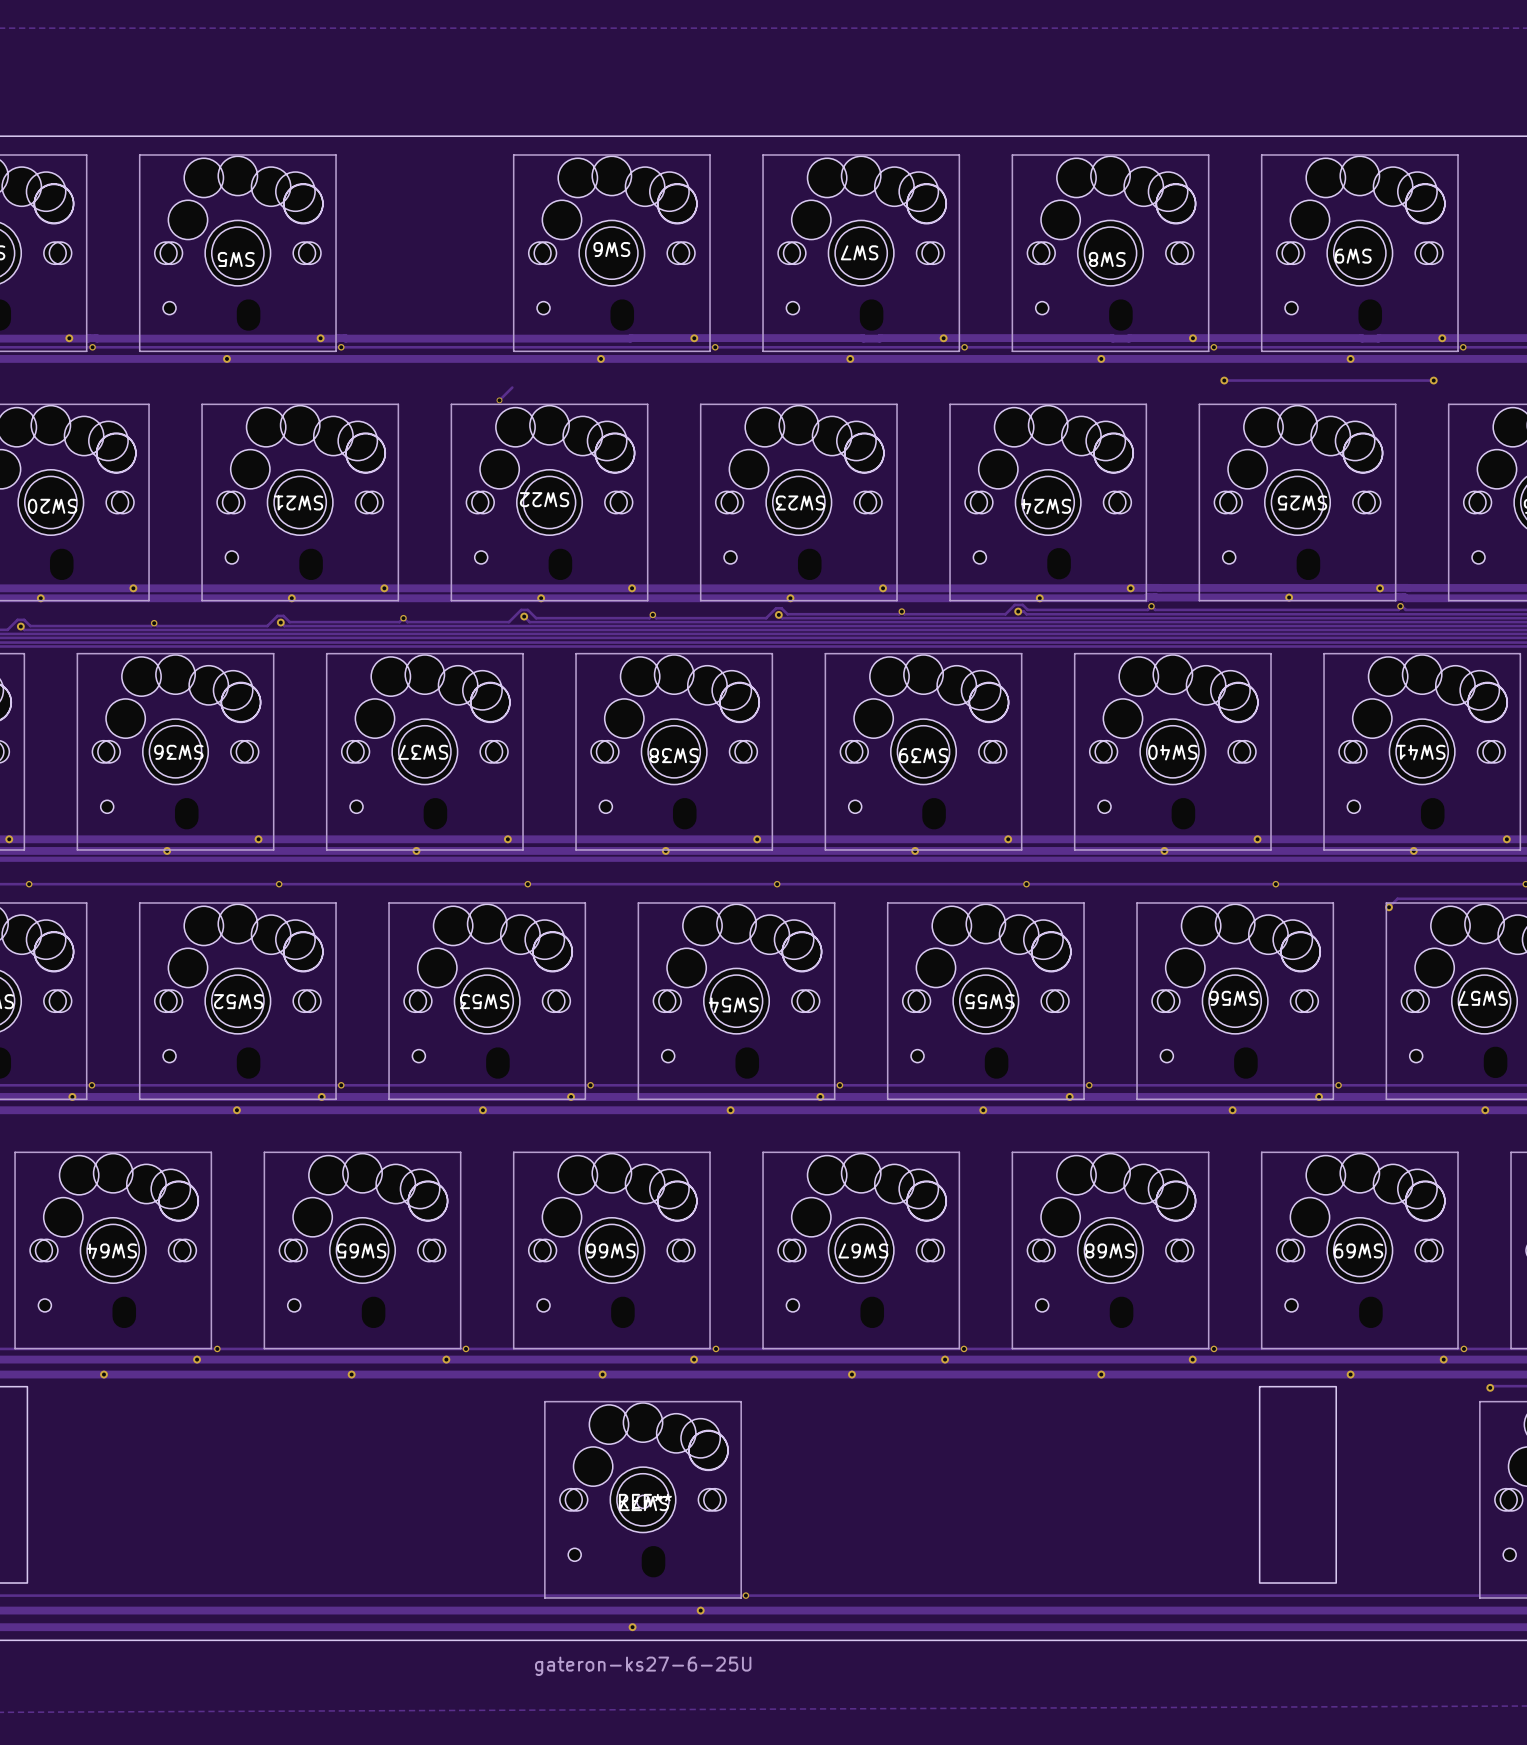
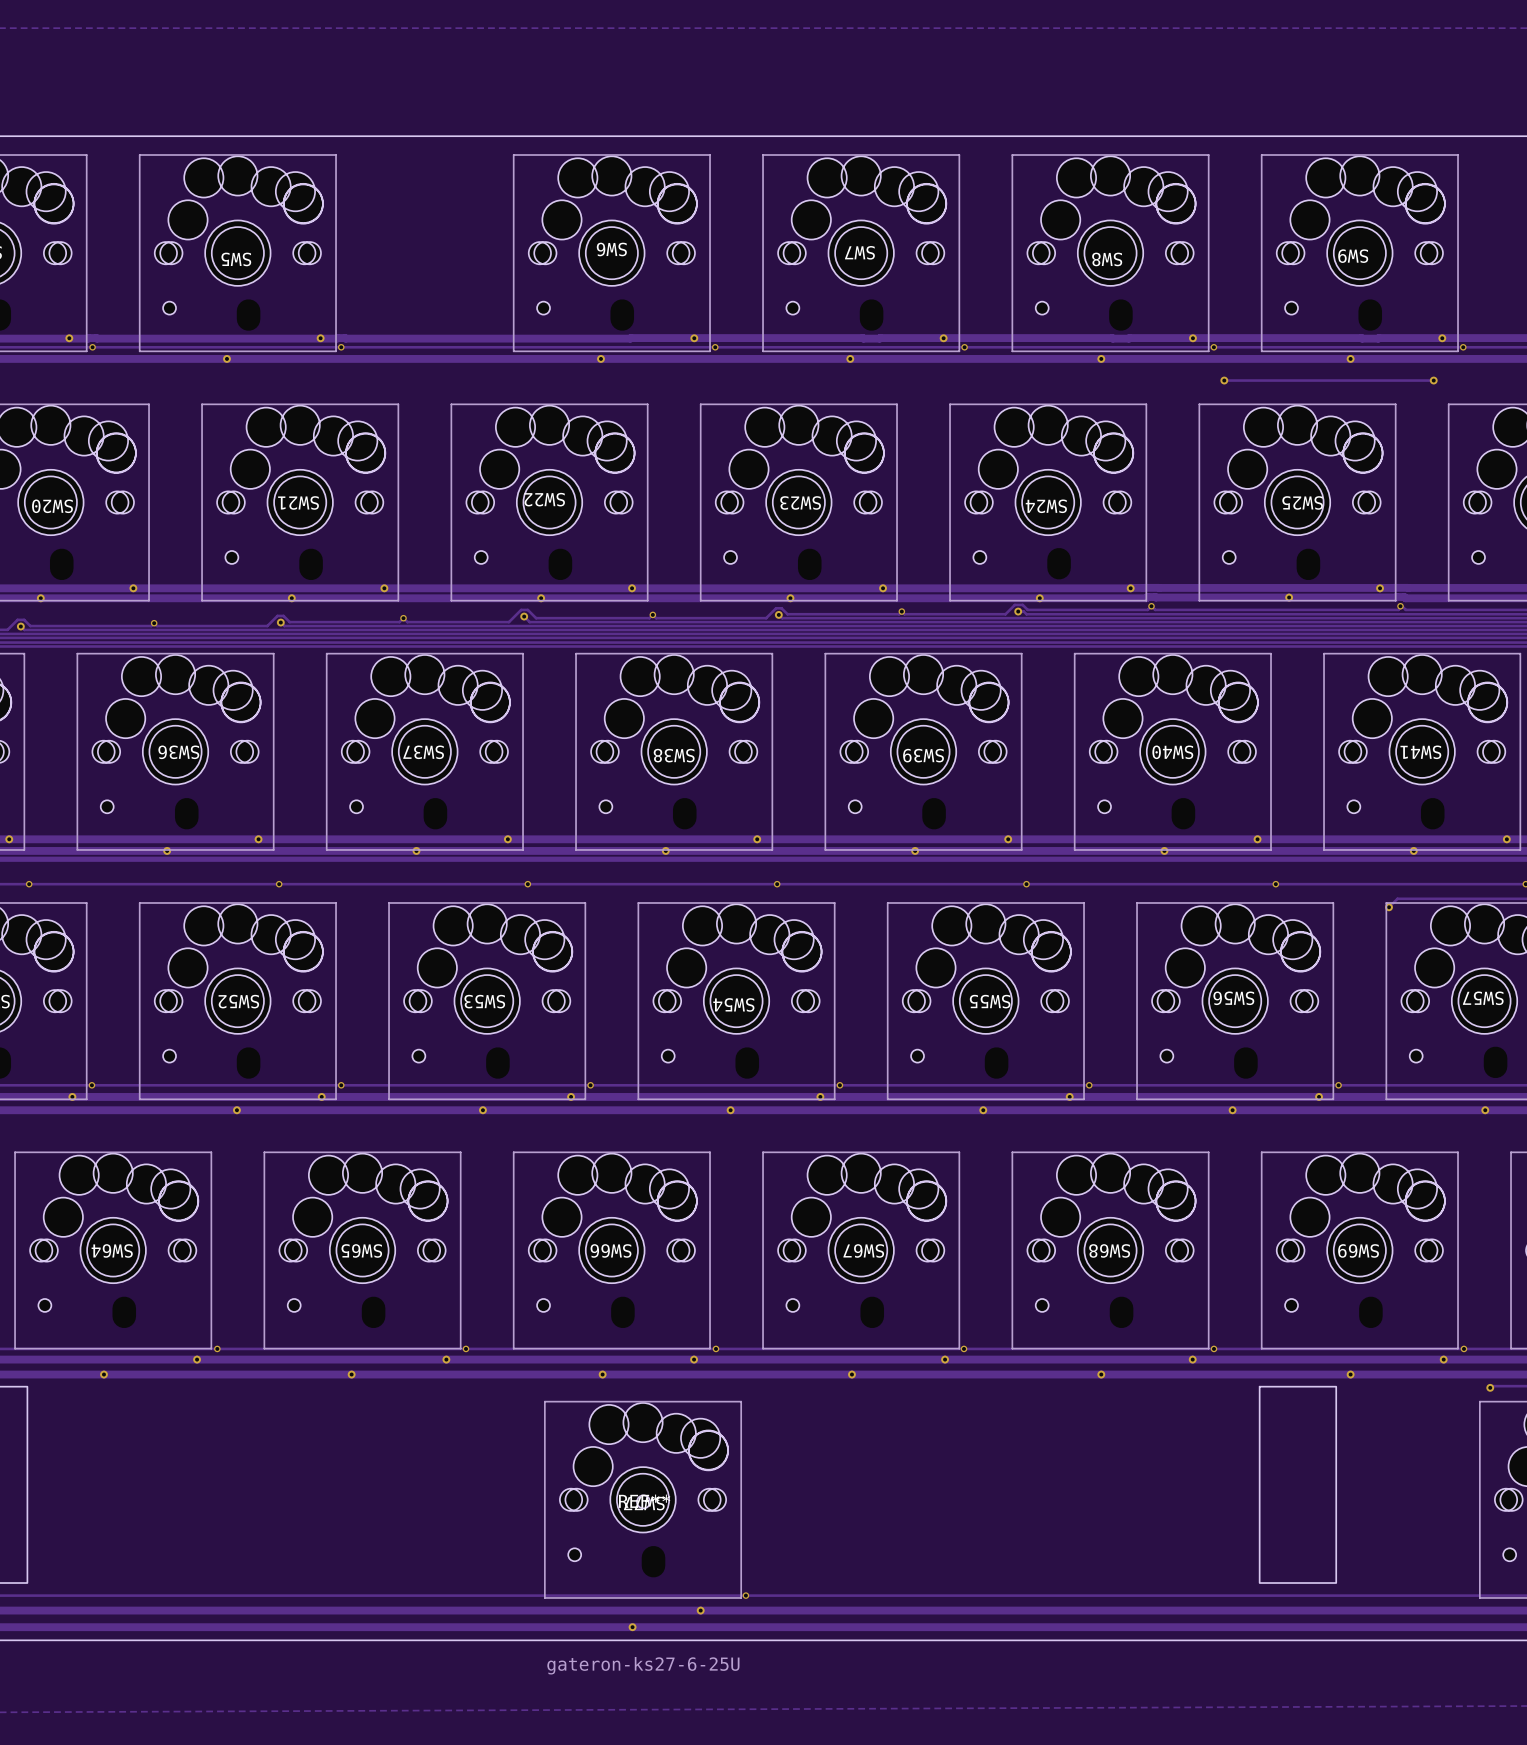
track: (512, 387) (499, 400) -> none
via: (499, 400) -> none

